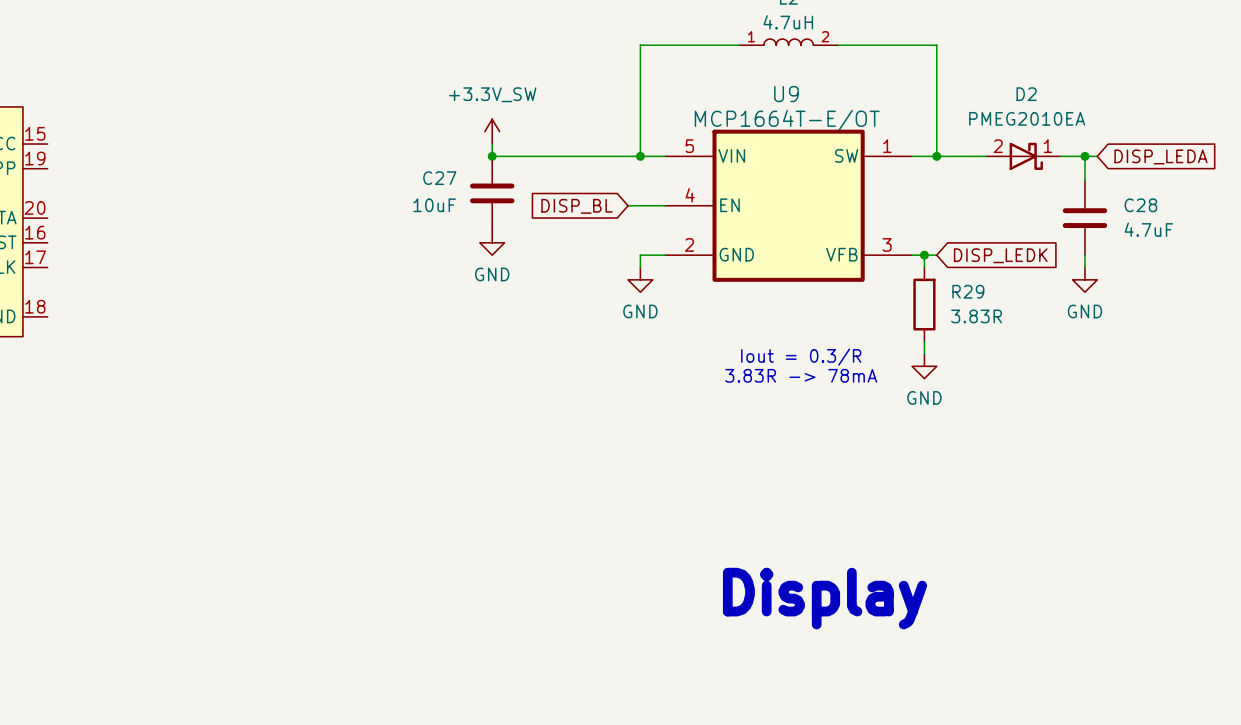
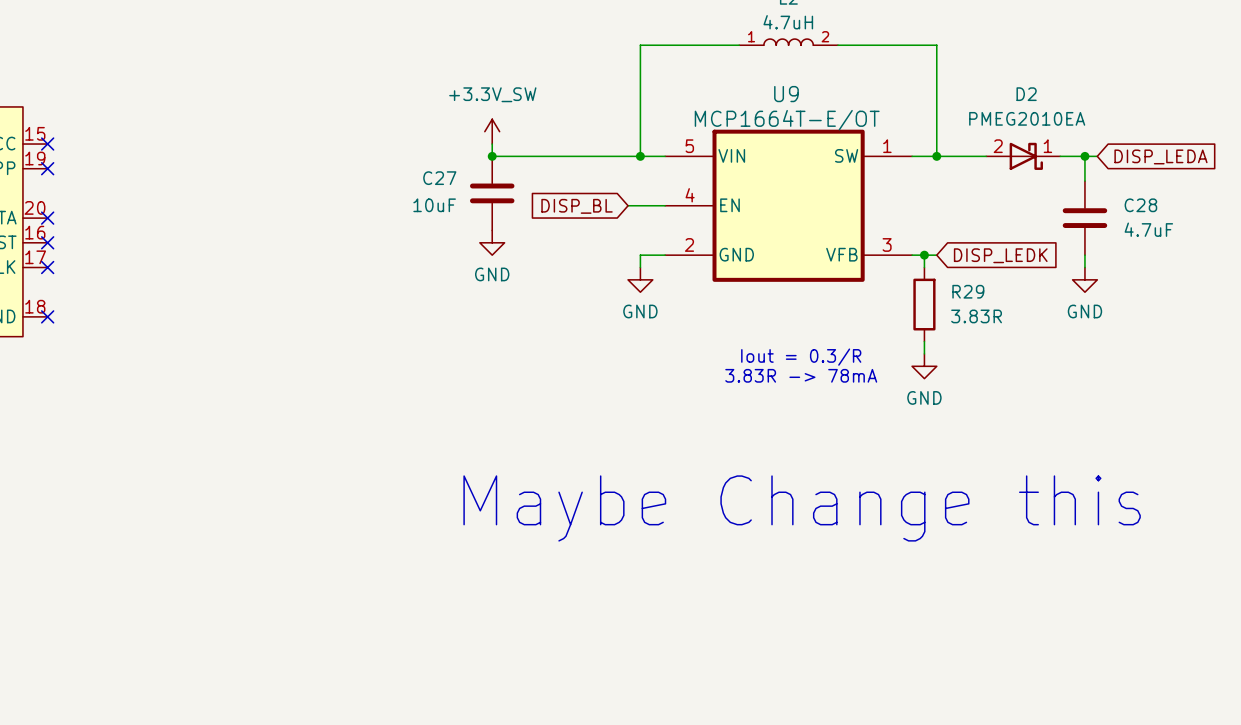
no-connect mark: none -> (47, 144)
no-connect mark: none -> (47, 168)
no-connect mark: none -> (47, 218)
no-connect mark: none -> (47, 242)
no-connect mark: none -> (47, 267)
no-connect mark: none -> (47, 316)
text: none -> Maybe Change this (802, 508)
text: Display (825, 598) -> none

